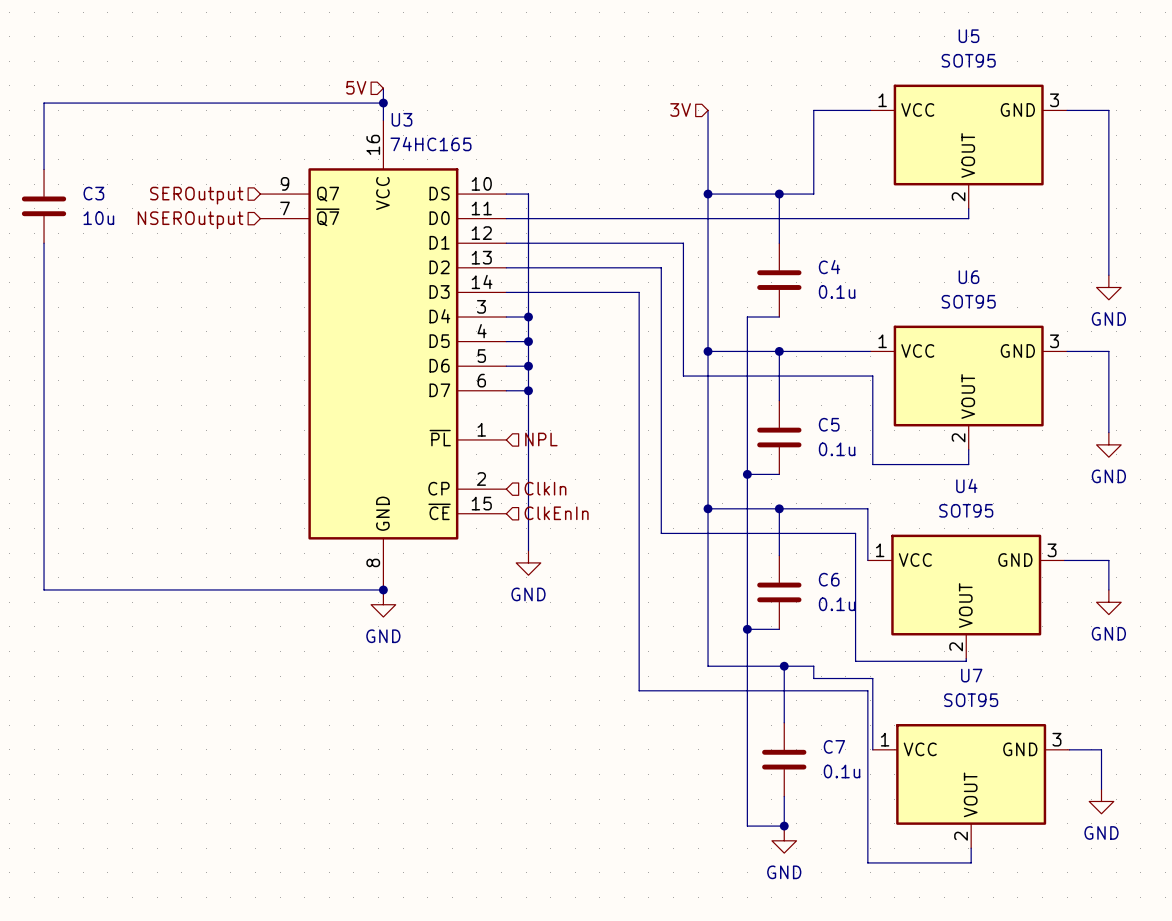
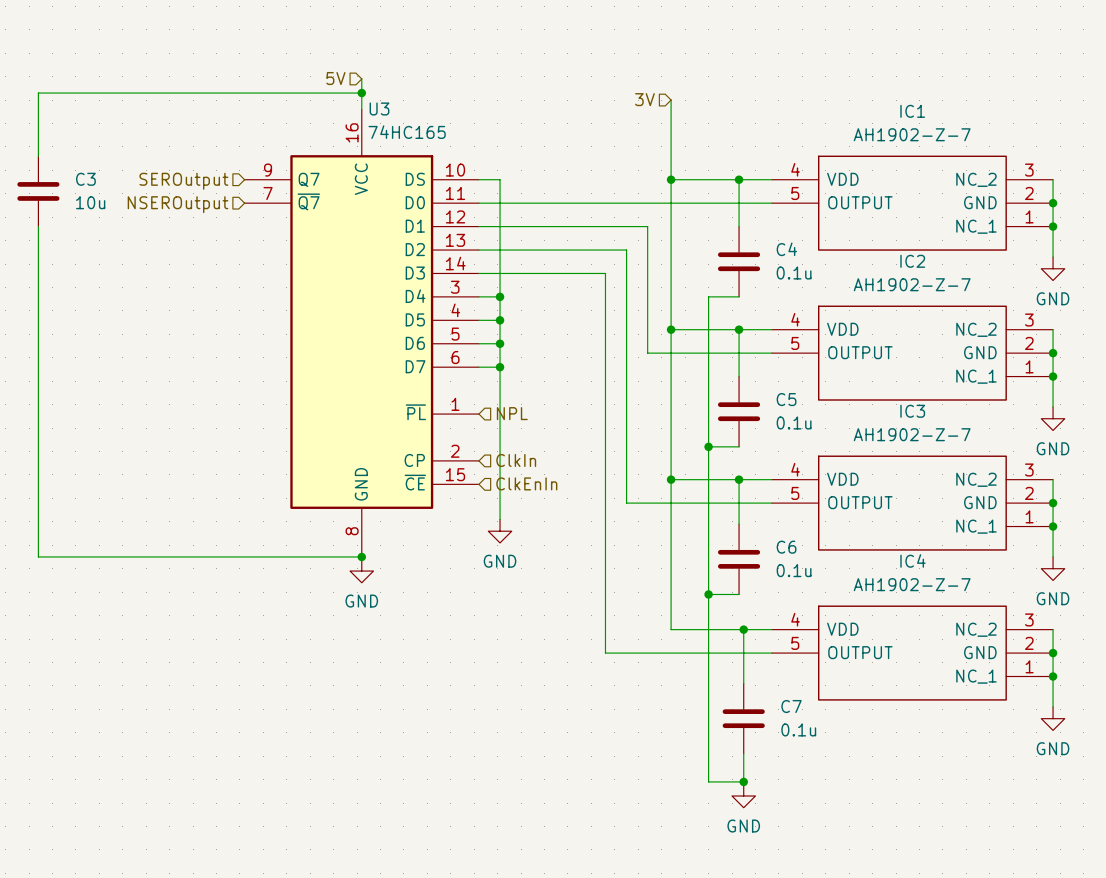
wire: (870, 110) (813, 110) (813, 194) -> none
wire: (1067, 110) (1108, 110) (1108, 194) -> none
U5: SOT95 (968, 146) -> none
wire: (968, 208) (968, 218) (813, 218) -> none
IC1: none -> AH1902-Z-7 (912, 203)
junction: none -> (1053, 203)
junction: none -> (1053, 226)
wire: (813, 376) (872, 376) (872, 464) (968, 464) (968, 449) -> none
IC2: none -> AH1902-Z-7 (912, 353)
junction: none -> (1053, 353)
U6: SOT95 (968, 387) -> none
junction: none -> (1053, 376)
wire: (813, 508) (867, 508) (867, 560) -> none
wire: (813, 533) (855, 533) (855, 661) (966, 661) (966, 658) -> none
IC3: none -> AH1902-Z-7 (912, 503)
junction: none -> (1053, 503)
junction: none -> (1053, 526)
wire: (1064, 560) (1108, 560) -> (1053, 479) (1053, 528)
U4: SOT95 (966, 596) -> none
wire: (813, 666) (813, 678) (872, 678) (872, 749) -> none
wire: none -> (1053, 629) (1053, 706)
wire: (813, 690) (867, 690) (867, 862) (971, 862) (971, 848) -> none
IC4: none -> AH1902-Z-7 (912, 653)
junction: none -> (1053, 653)
junction: none -> (1053, 676)
wire: (1069, 749) (1101, 749) (1101, 789) -> none
U7: SOT95 (971, 786) -> none
power symbol position: GND (1101, 801) -> GND (1053, 718)

